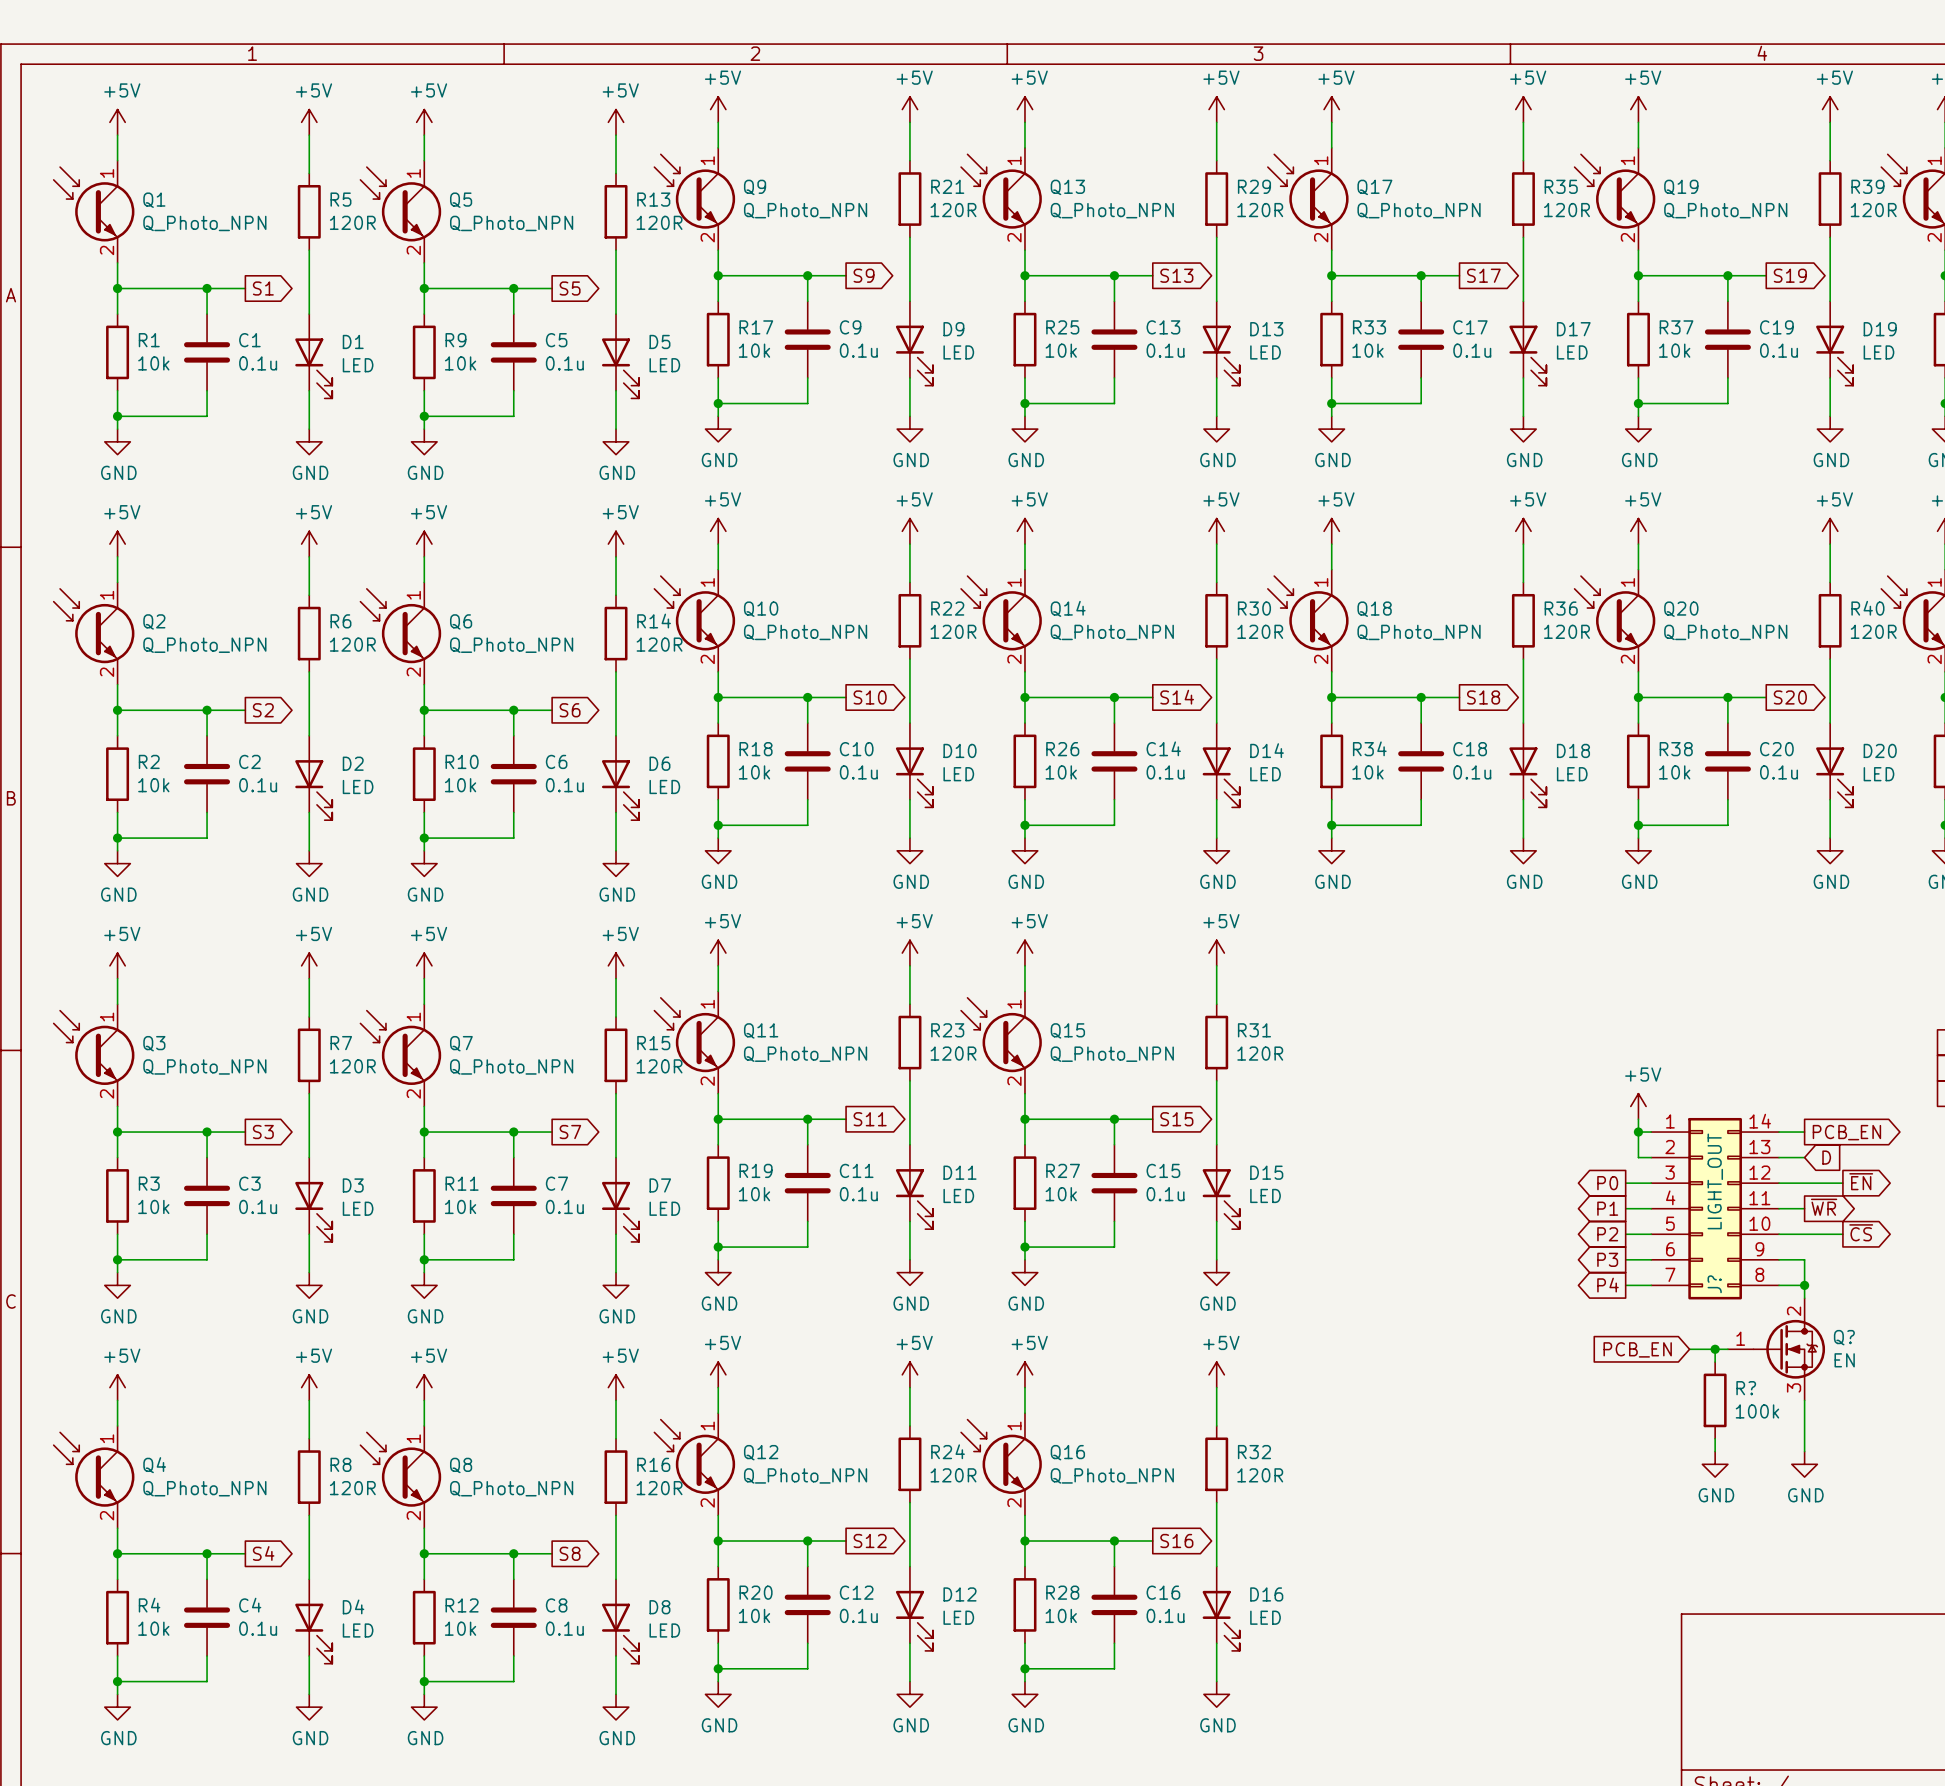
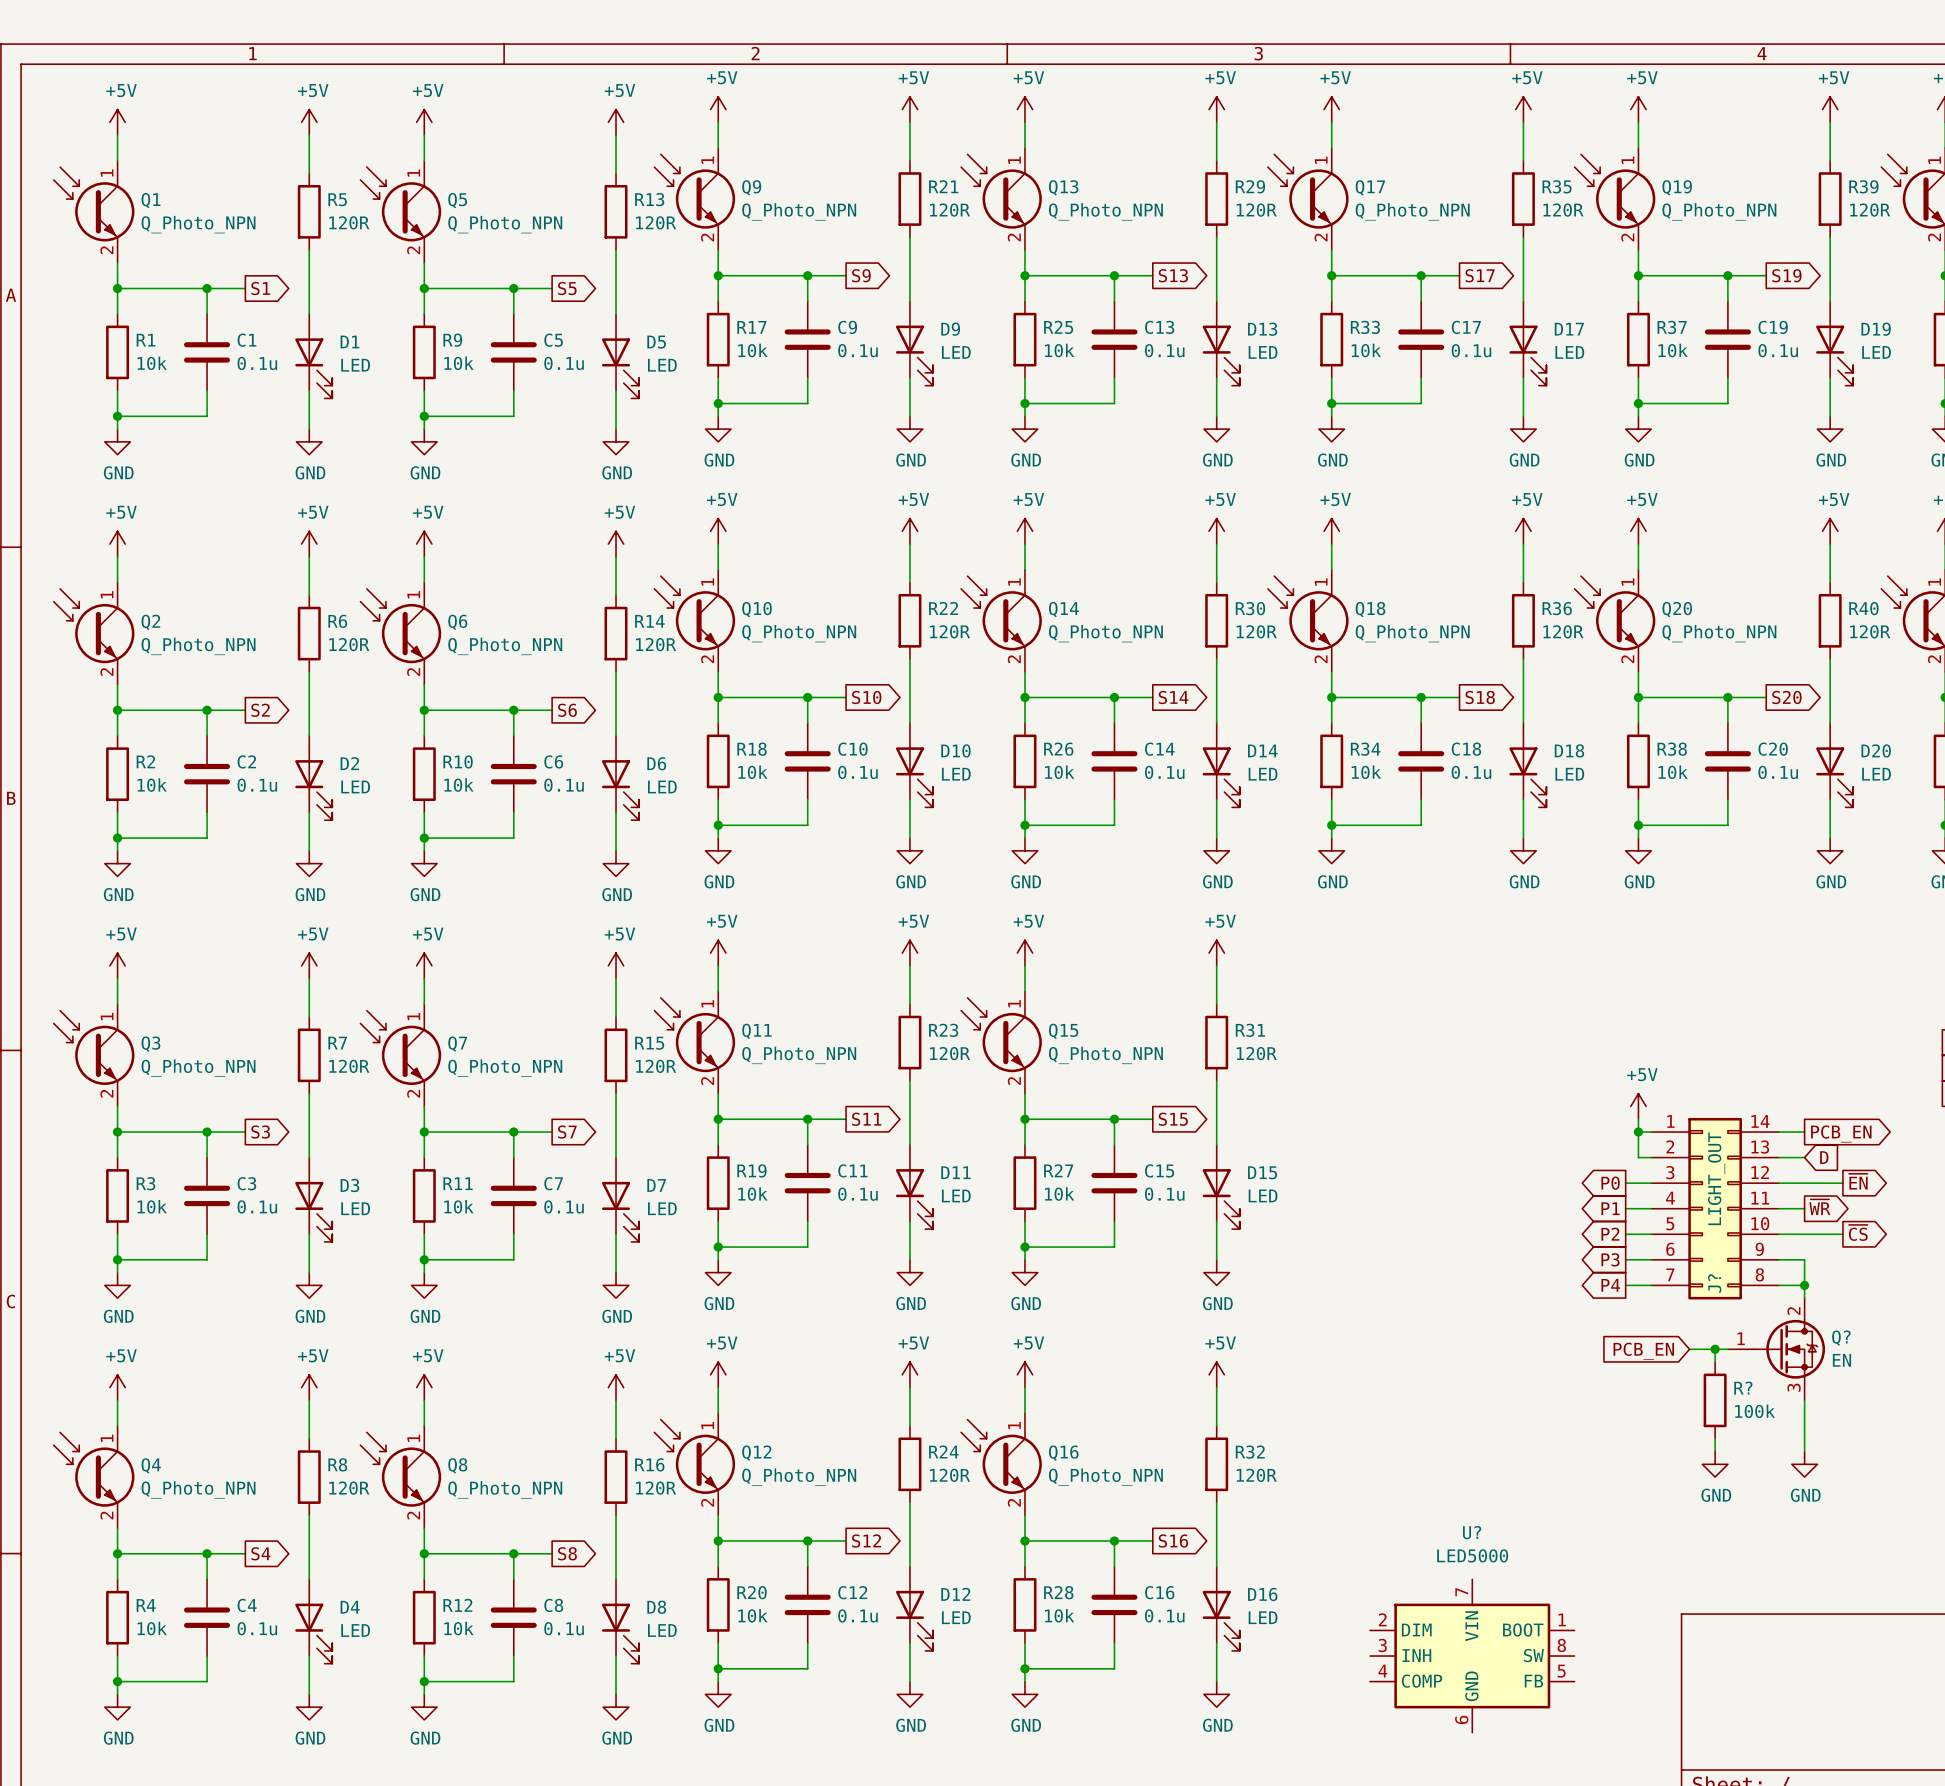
U?: none -> LED5000 (1472, 1656)

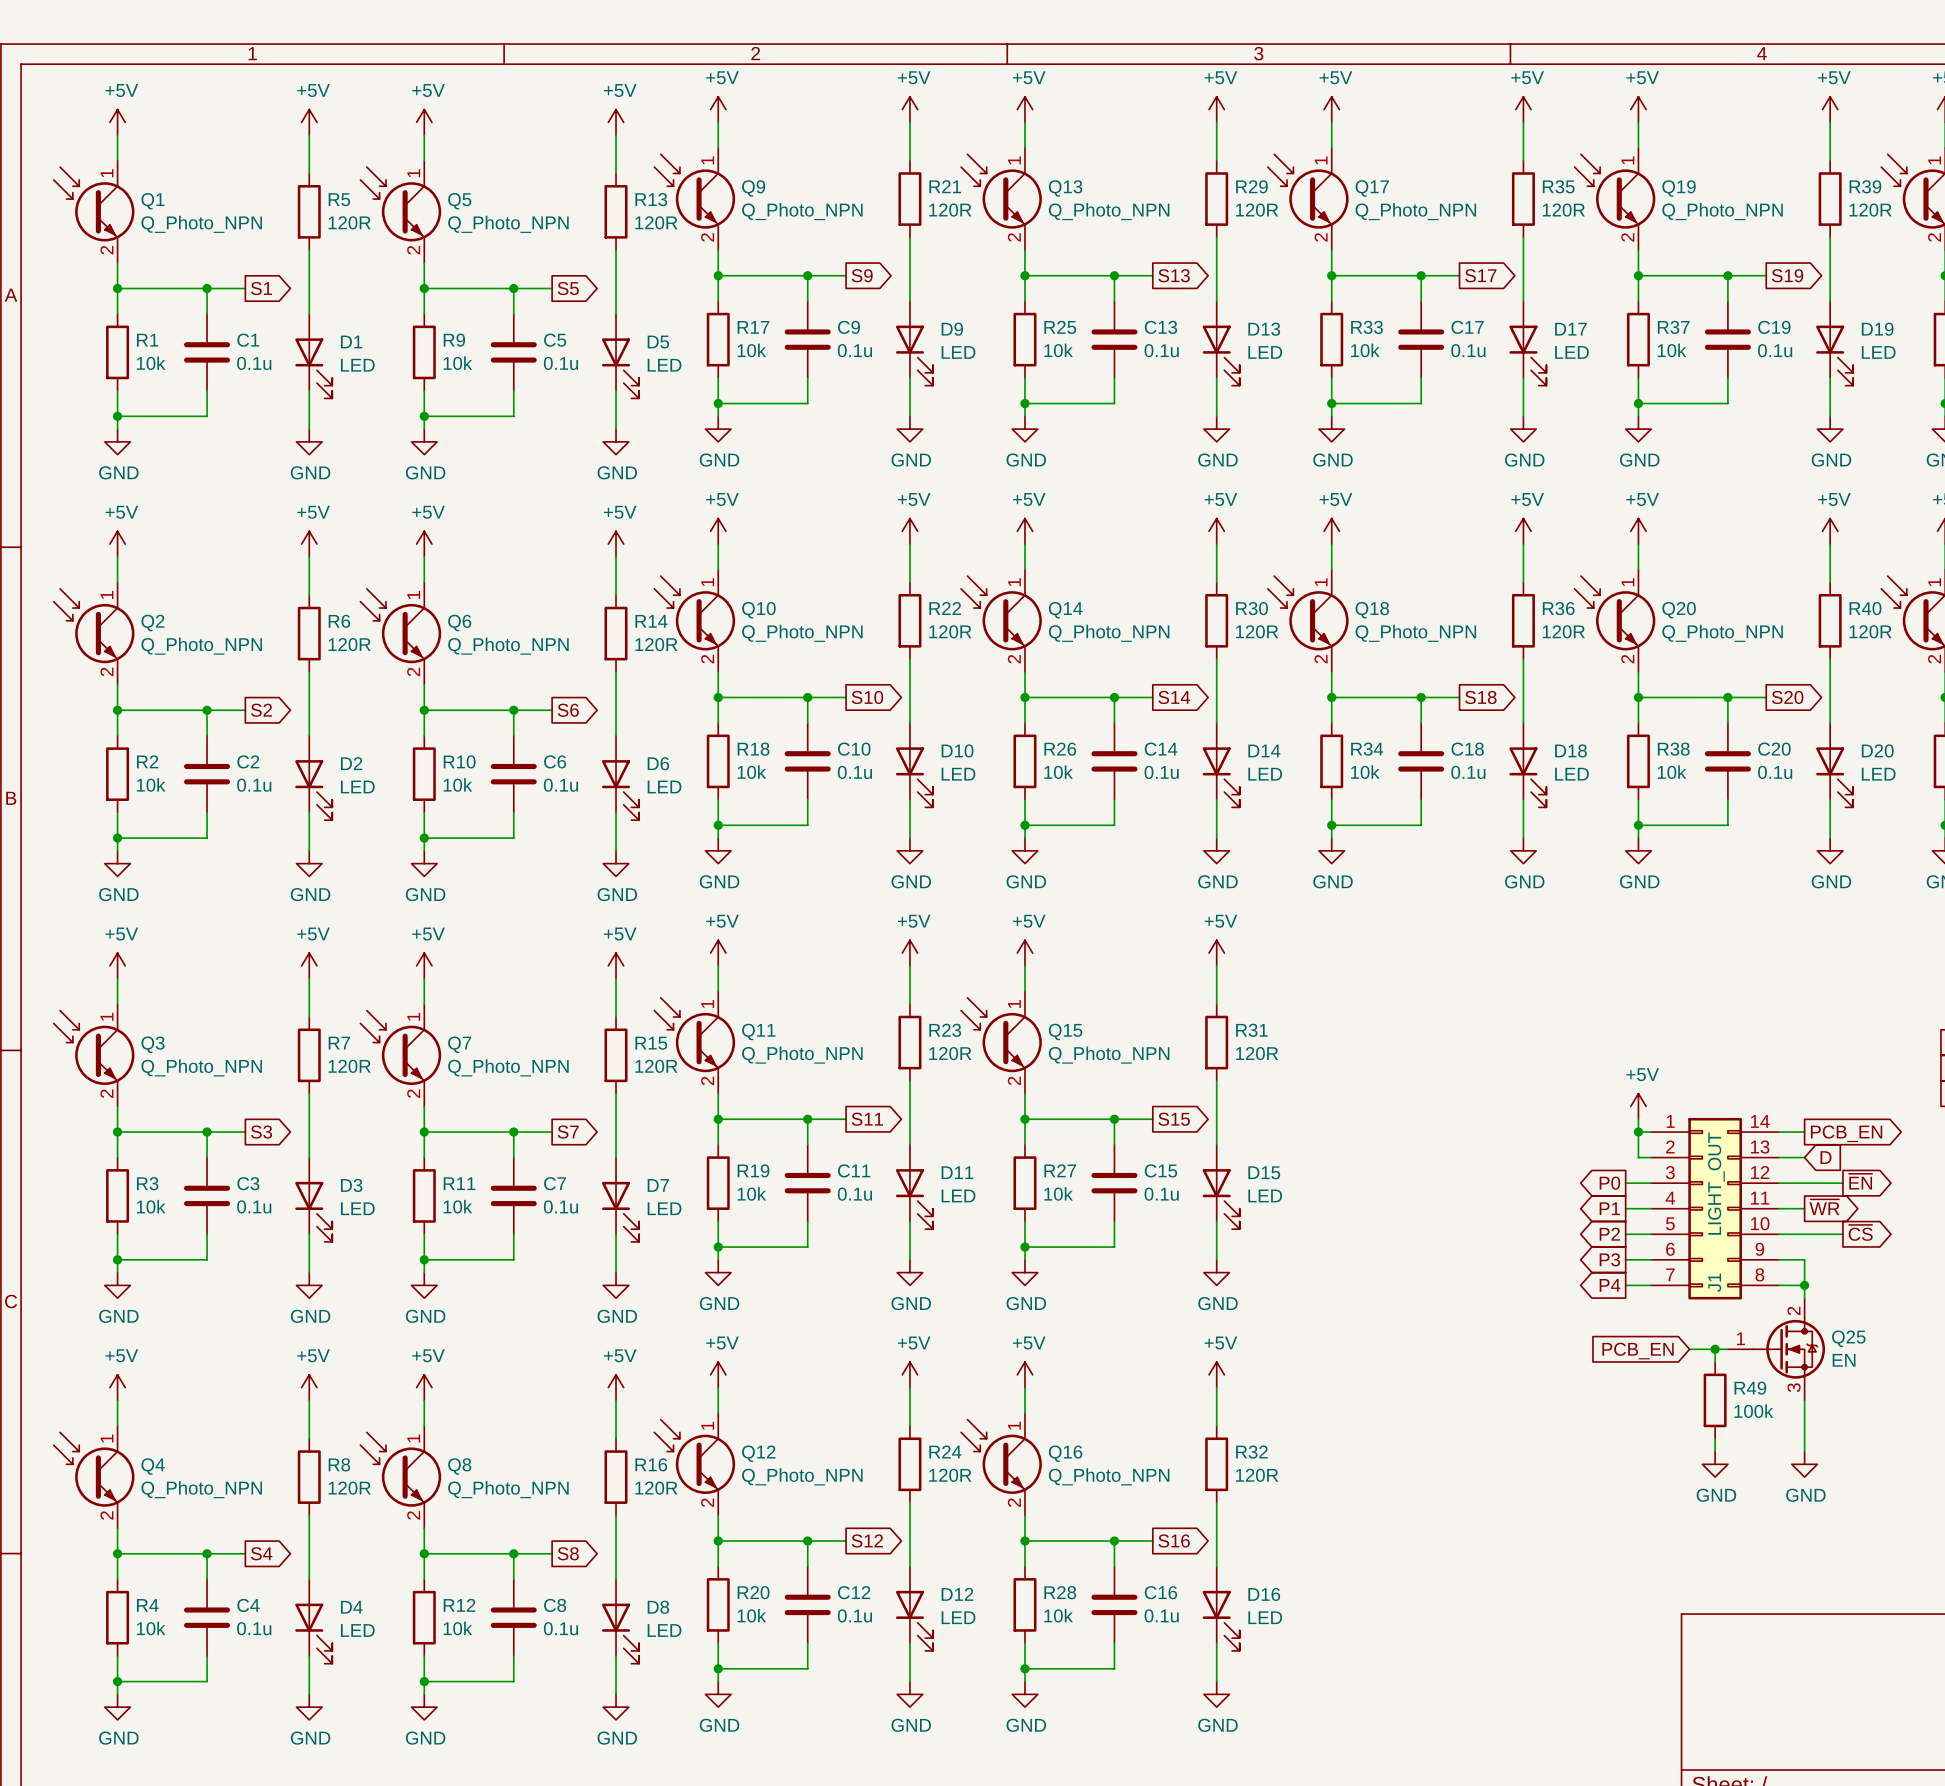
J? name: J? (1714, 1283) -> J1 (1714, 1282)
Q? name: Q? (1841, 1338) -> Q25 (1848, 1338)
R? name: R? (1743, 1388) -> R49 (1750, 1388)
U?: LED5000 (1472, 1656) -> none

